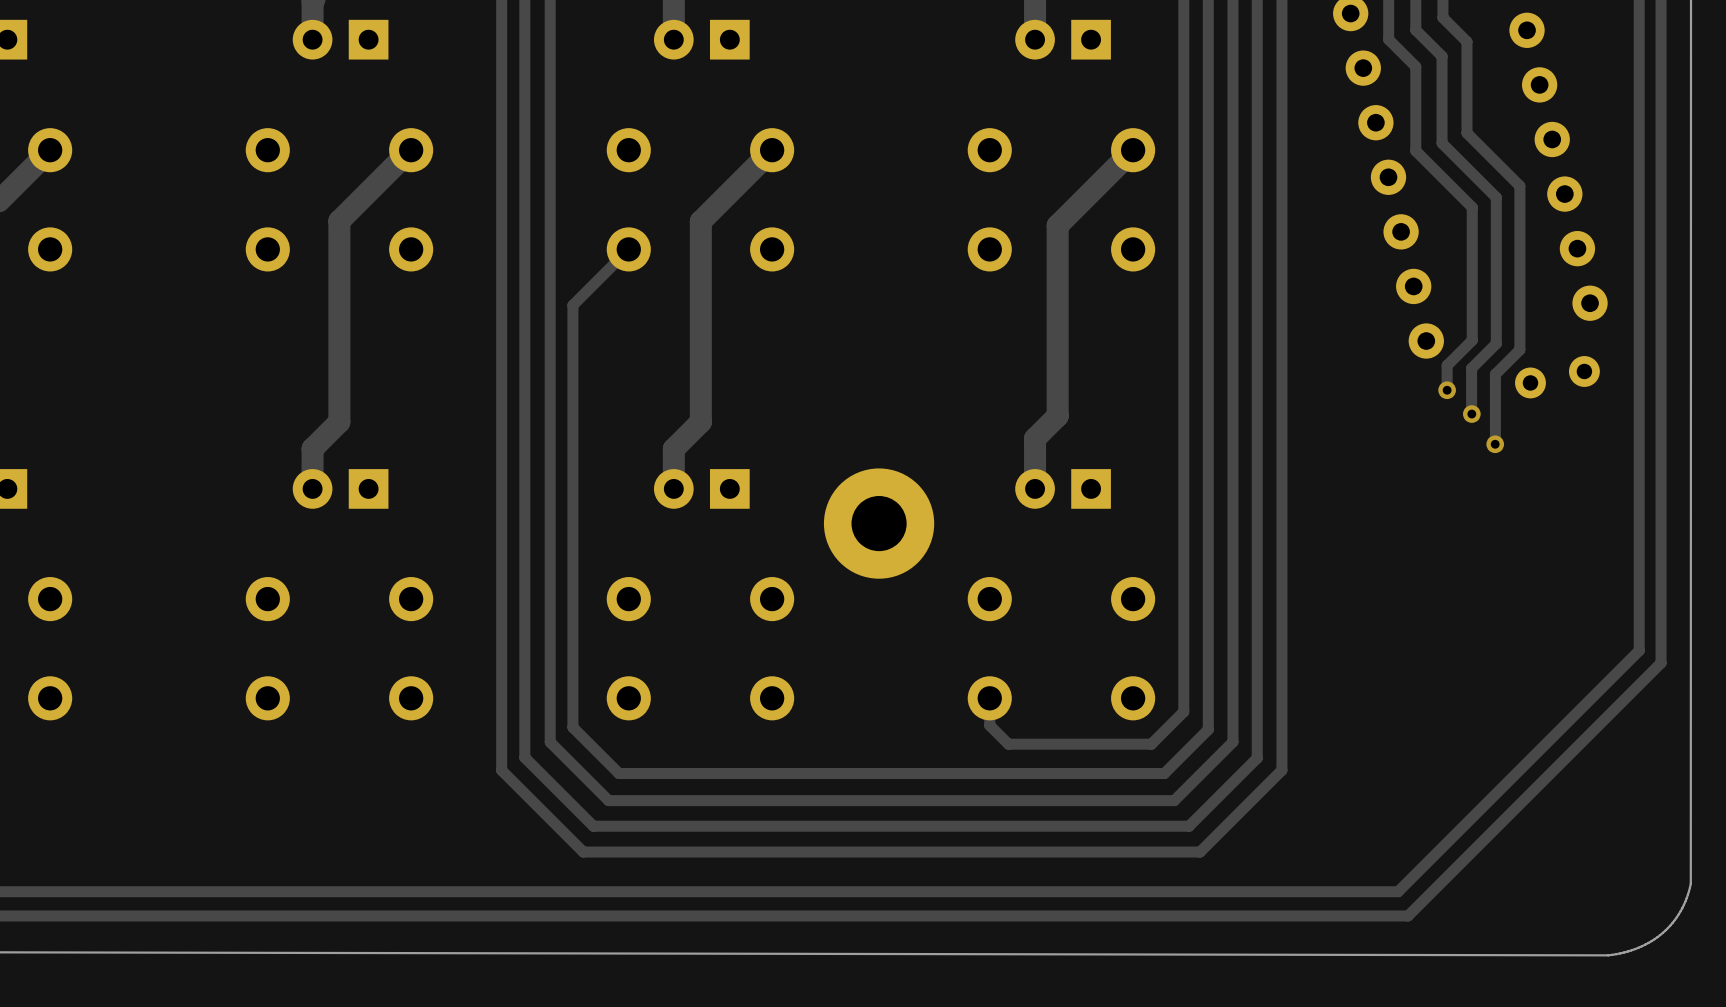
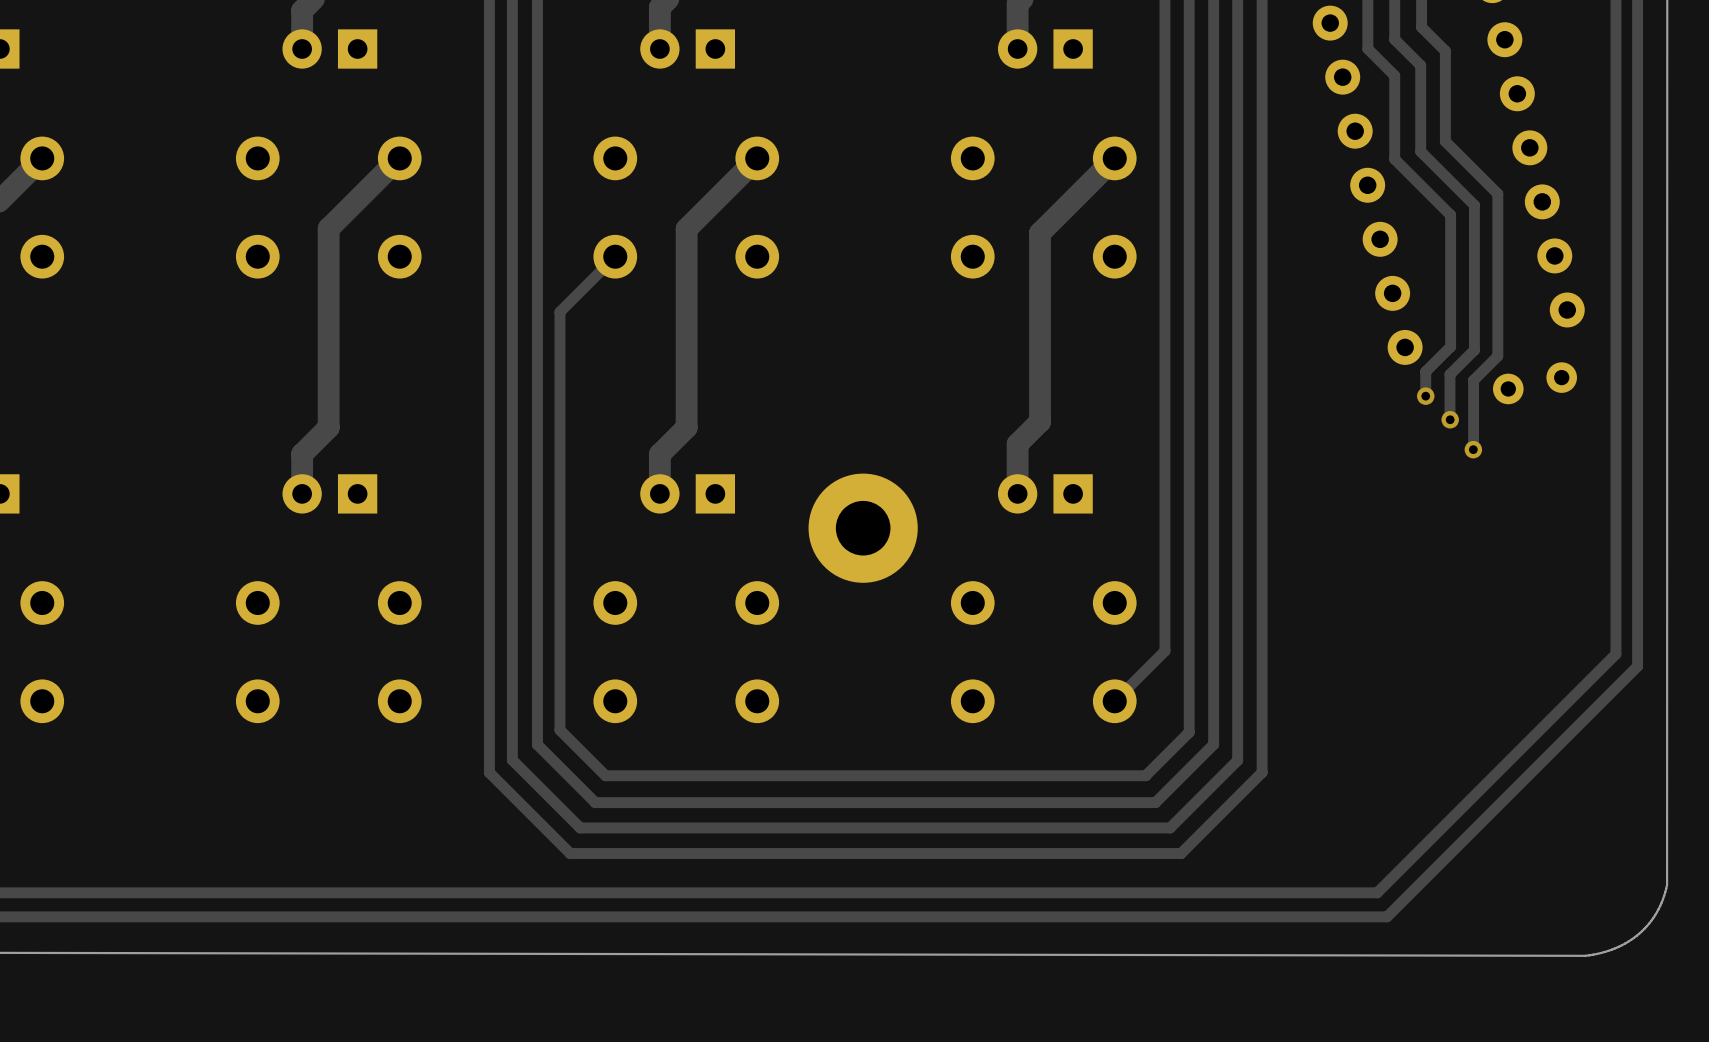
track: (1183, 647) (1183, 711) (1151, 744) (1008, 744) (989, 725) (989, 698) -> (1164, 651) (1114, 701)

